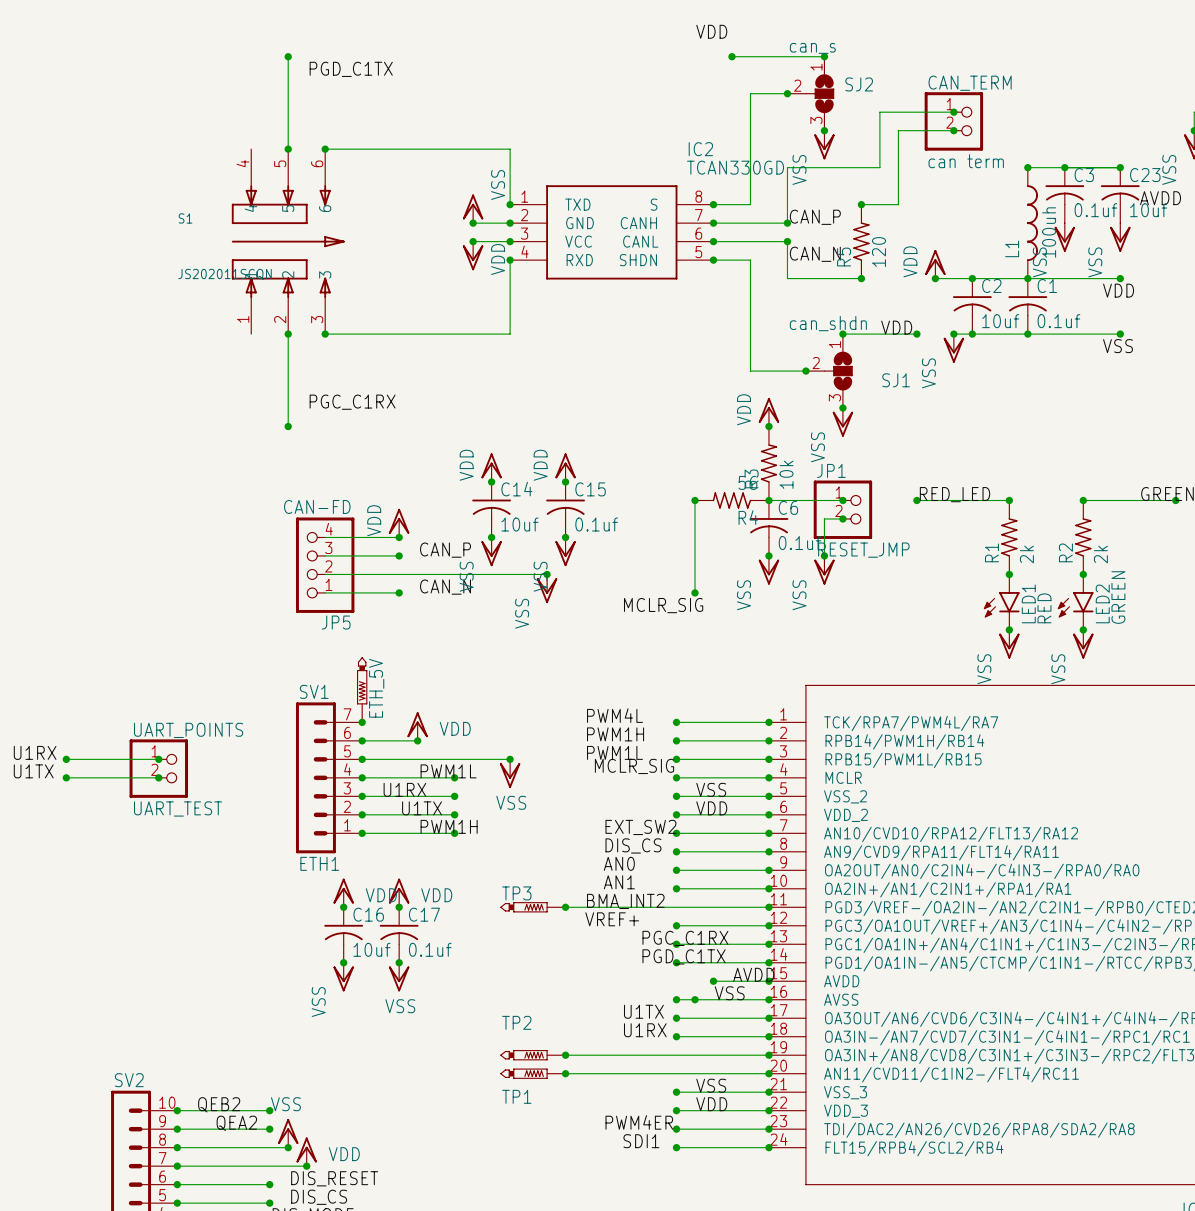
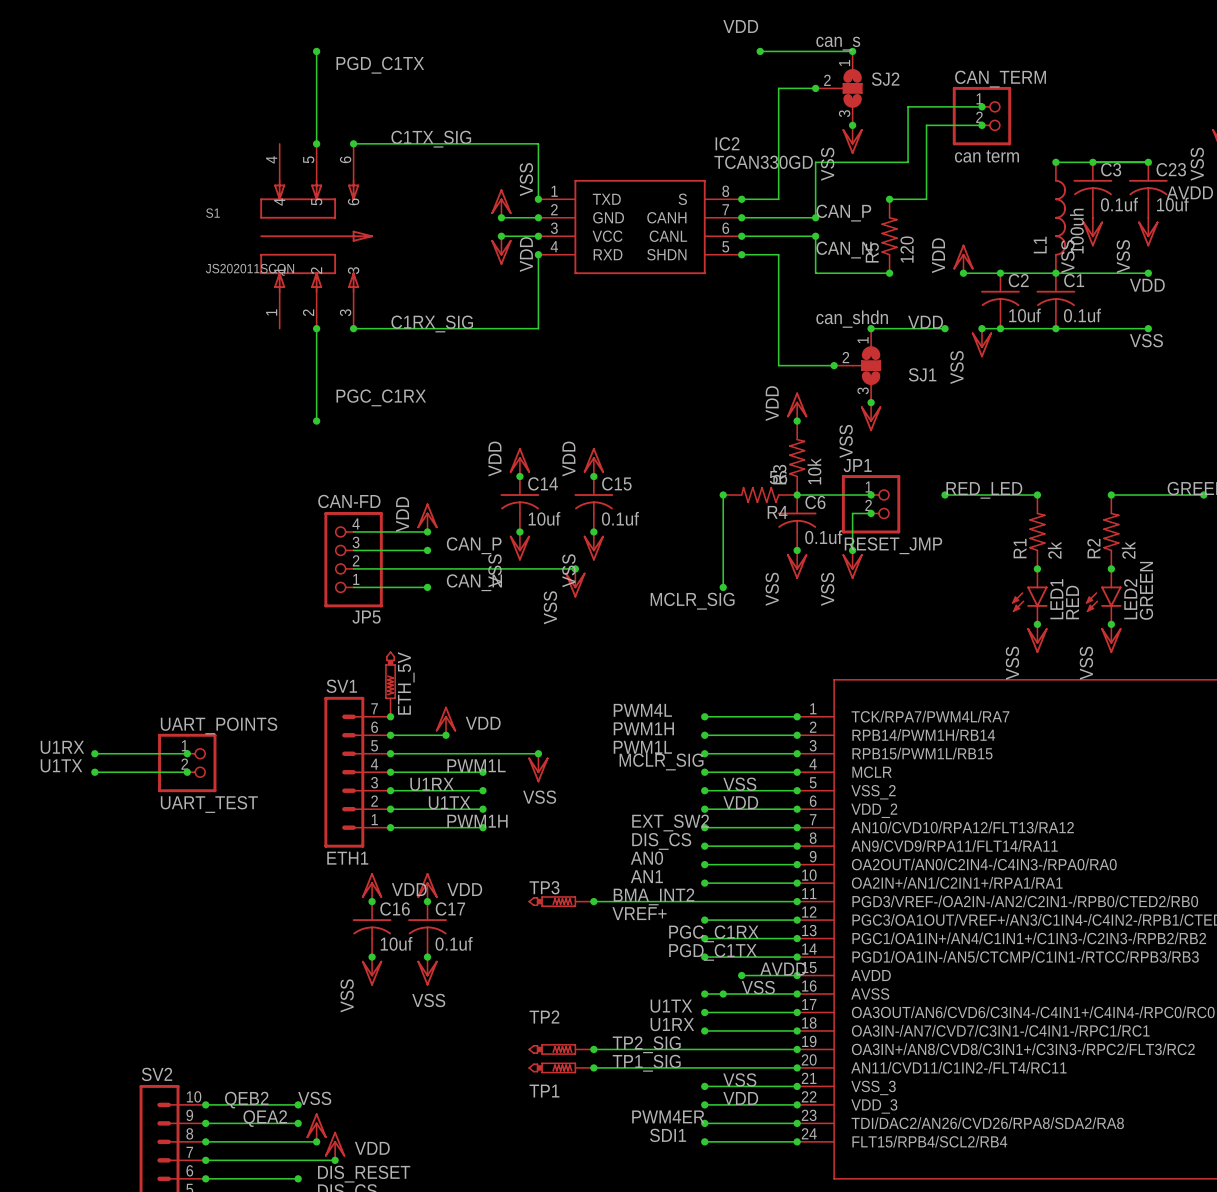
label: none -> C1TX_SIG (431, 139)
label: none -> C1RX_SIG (432, 323)
label: none -> TP2_SIG (646, 1044)
label: none -> TP1_SIG (646, 1063)

